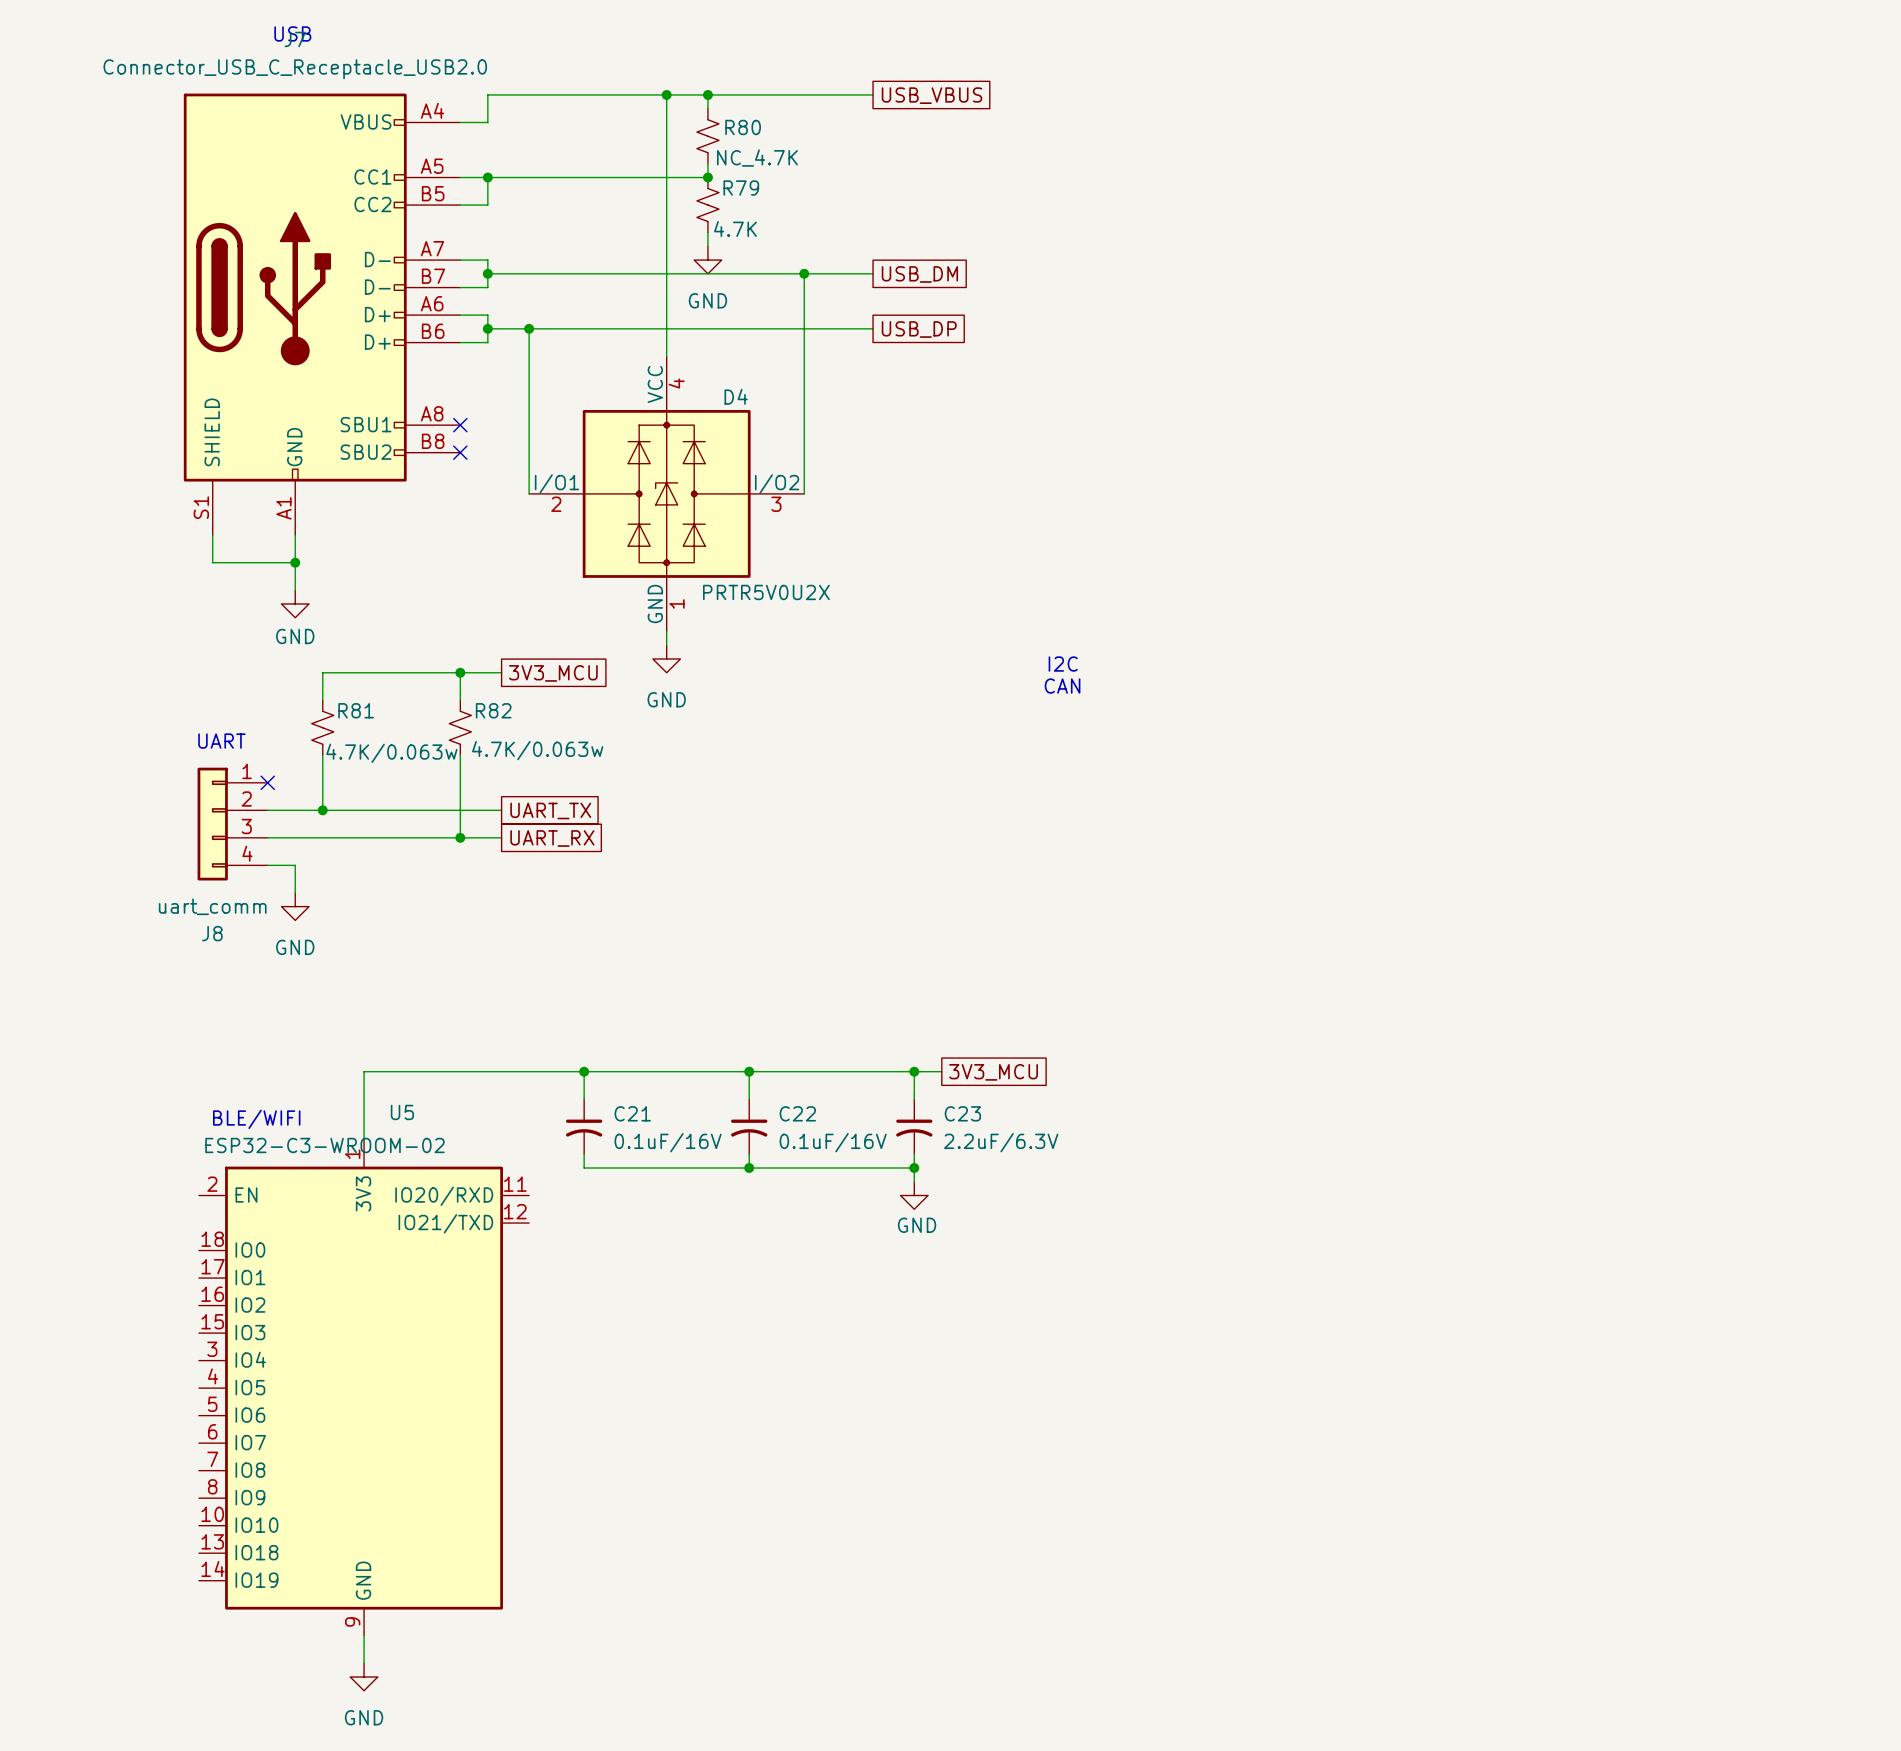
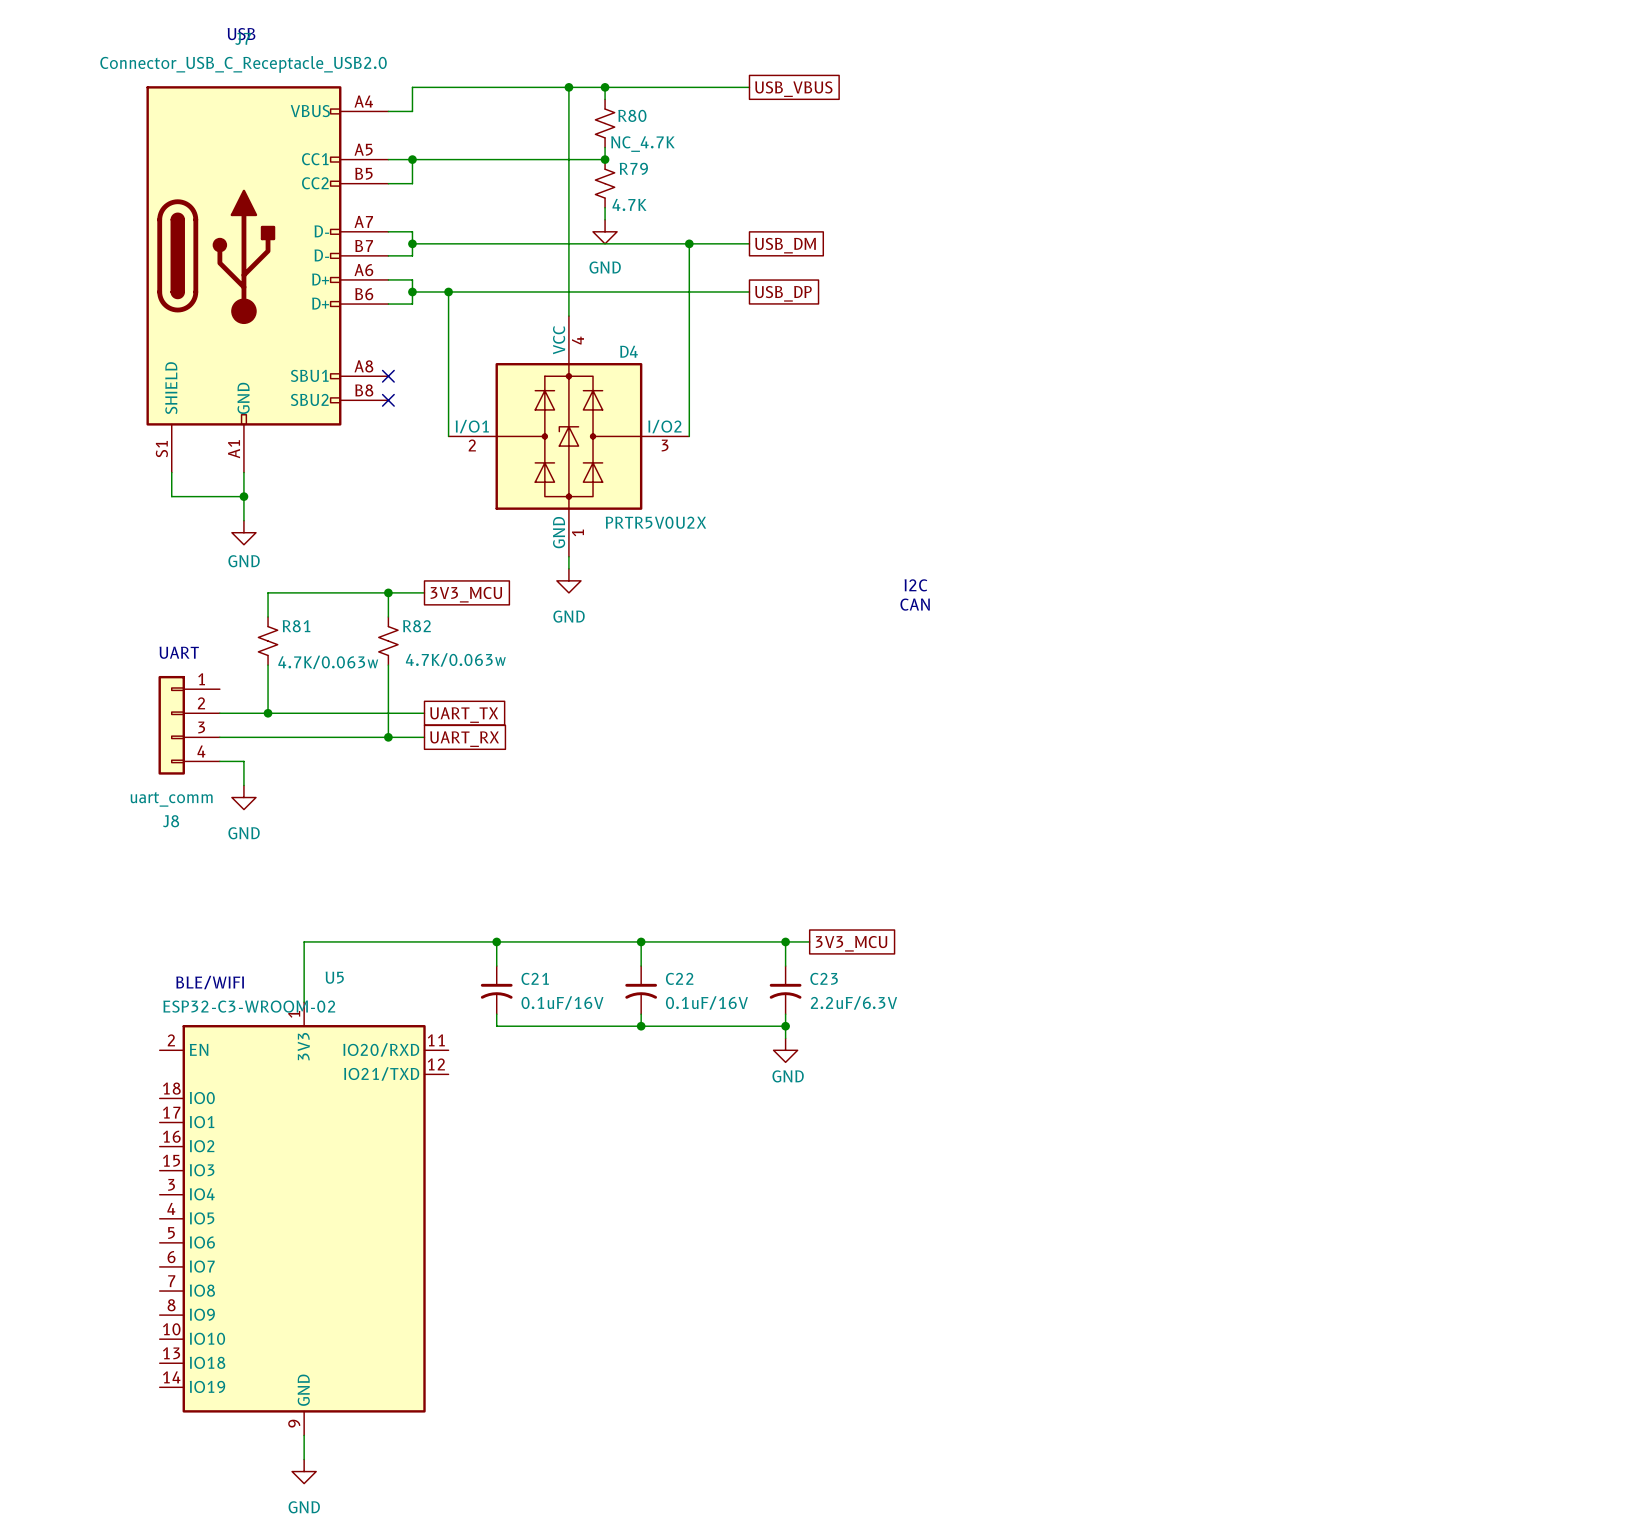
no-connect mark: (267, 782) -> none

